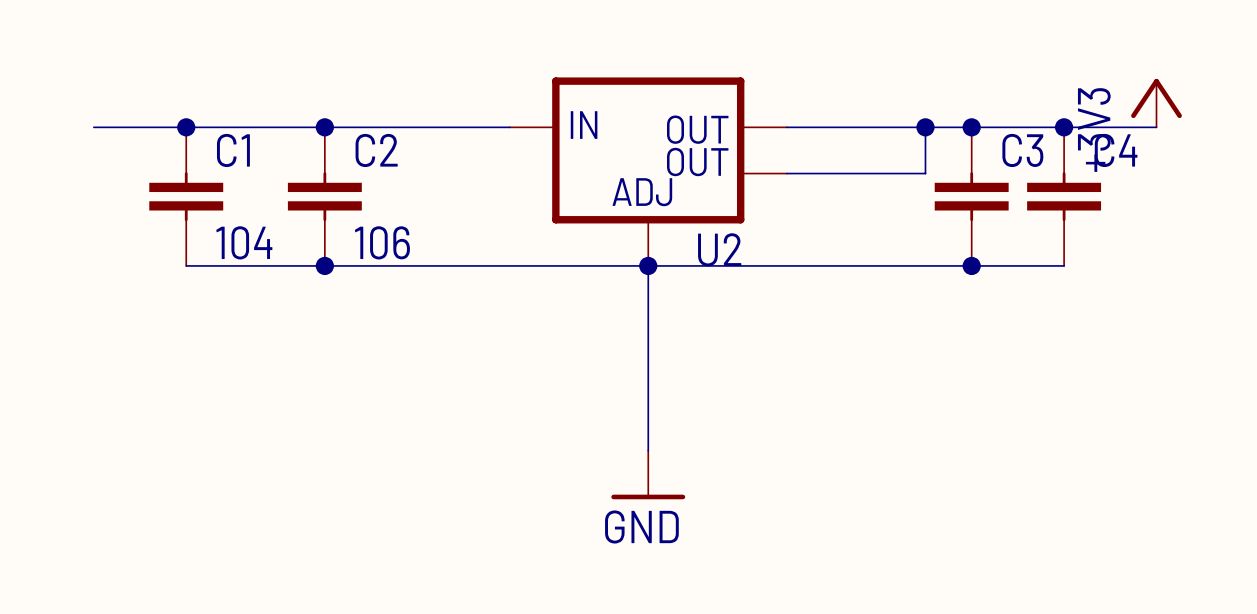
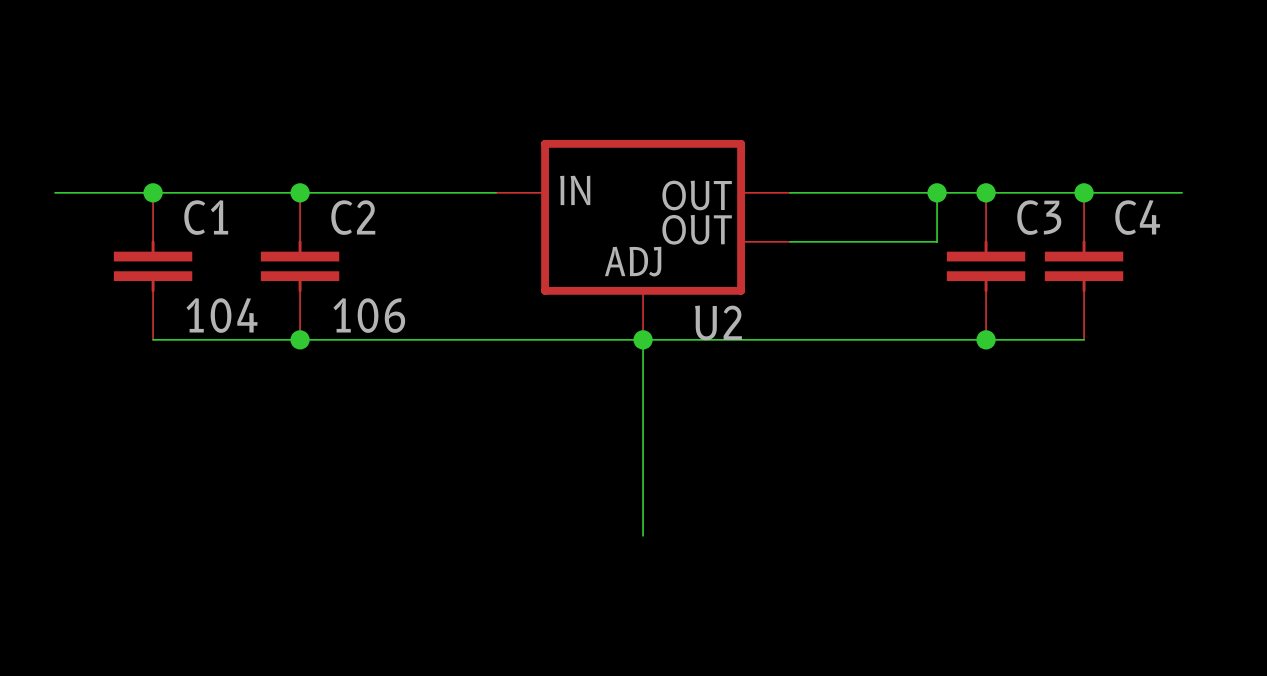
power symbol: +3V3 (1156, 103) -> none
power symbol: GND (648, 475) -> none

